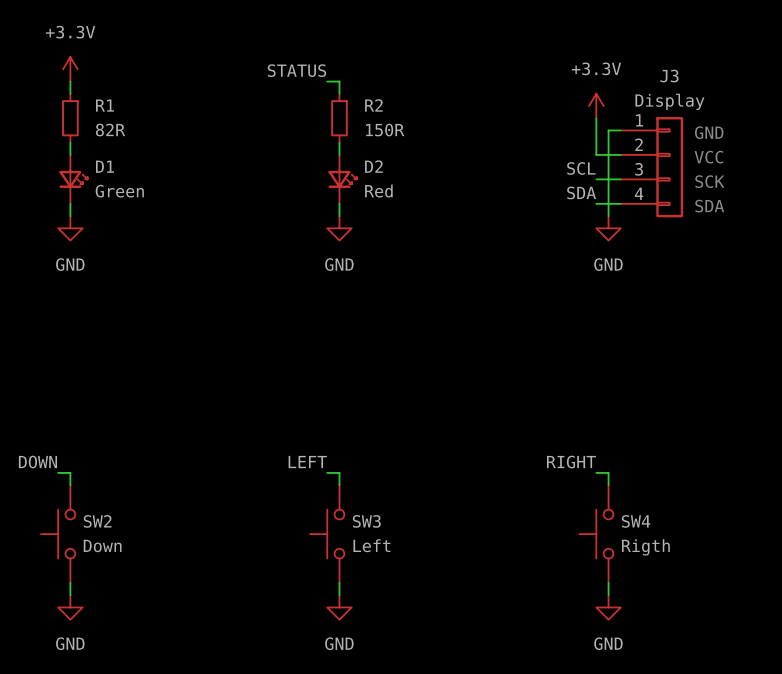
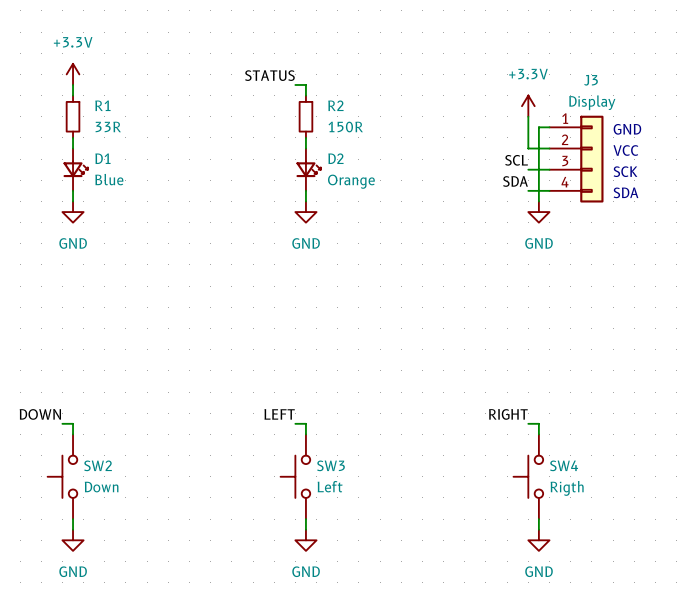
R1 value: 82R (110, 130) -> 33R (108, 126)
D1 value: Green (119, 191) -> Blue (109, 179)
D2 value: Red (378, 191) -> Orange (351, 181)

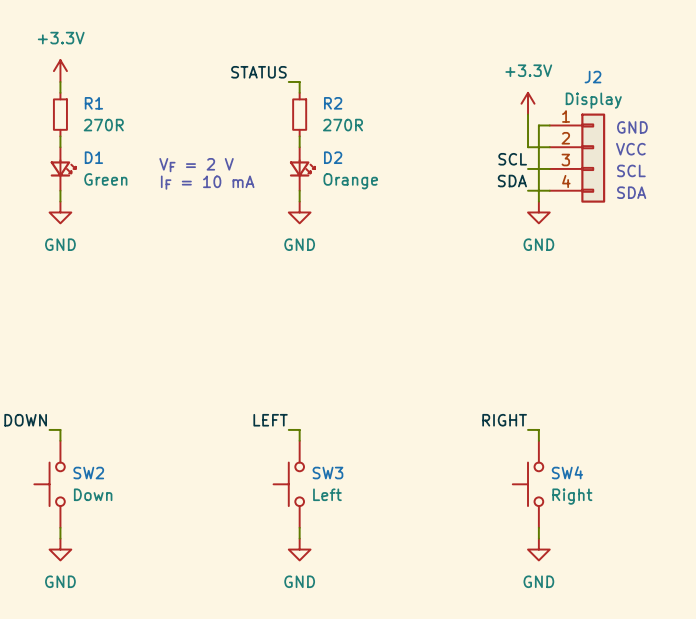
J3 name: J3 (591, 80) -> J2 (592, 77)
R1 value: 33R (108, 126) -> 270R (103, 125)
R2 value: 150R (345, 127) -> 270R (342, 125)
text: none -> VF = 2 V (196, 165)
text: SCK (625, 171) -> SCL (631, 170)
D1 value: Blue (109, 179) -> Green (105, 179)
text: none -> IF = 10 mA (207, 182)
SW4 value: Rigth (567, 488) -> Right (572, 496)

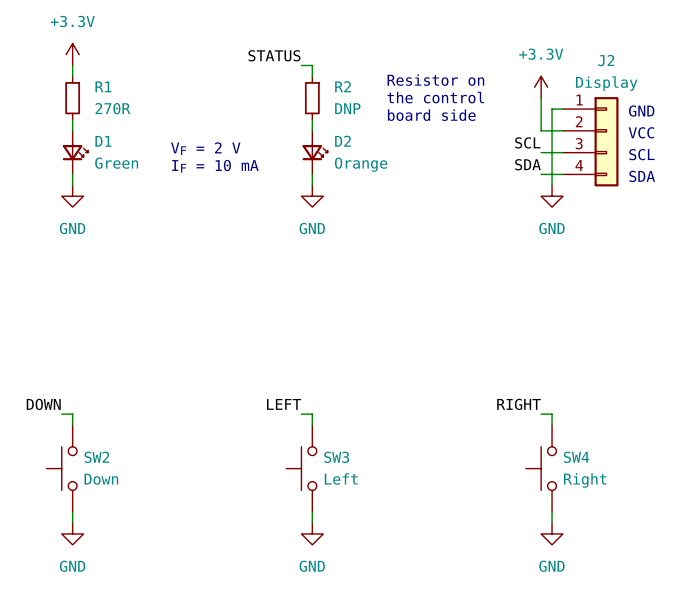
text: none -> Resistor on (435, 80)
text: none -> the control (435, 97)
R2 value: 270R (342, 125) -> DNP (347, 108)
text: none -> board side (431, 115)

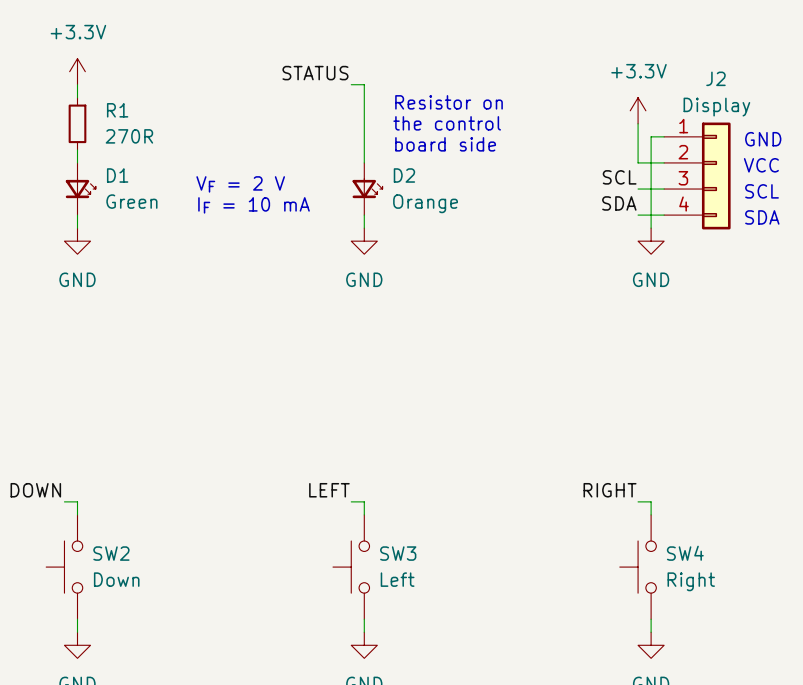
wire: none -> (364, 97) (364, 149)
text position: Resistor on (435, 80) -> Resistor on (449, 102)
text position: the control (435, 97) -> the control (447, 123)
R2: DNP (312, 98) -> none
text position: board side (431, 115) -> board side (445, 144)

